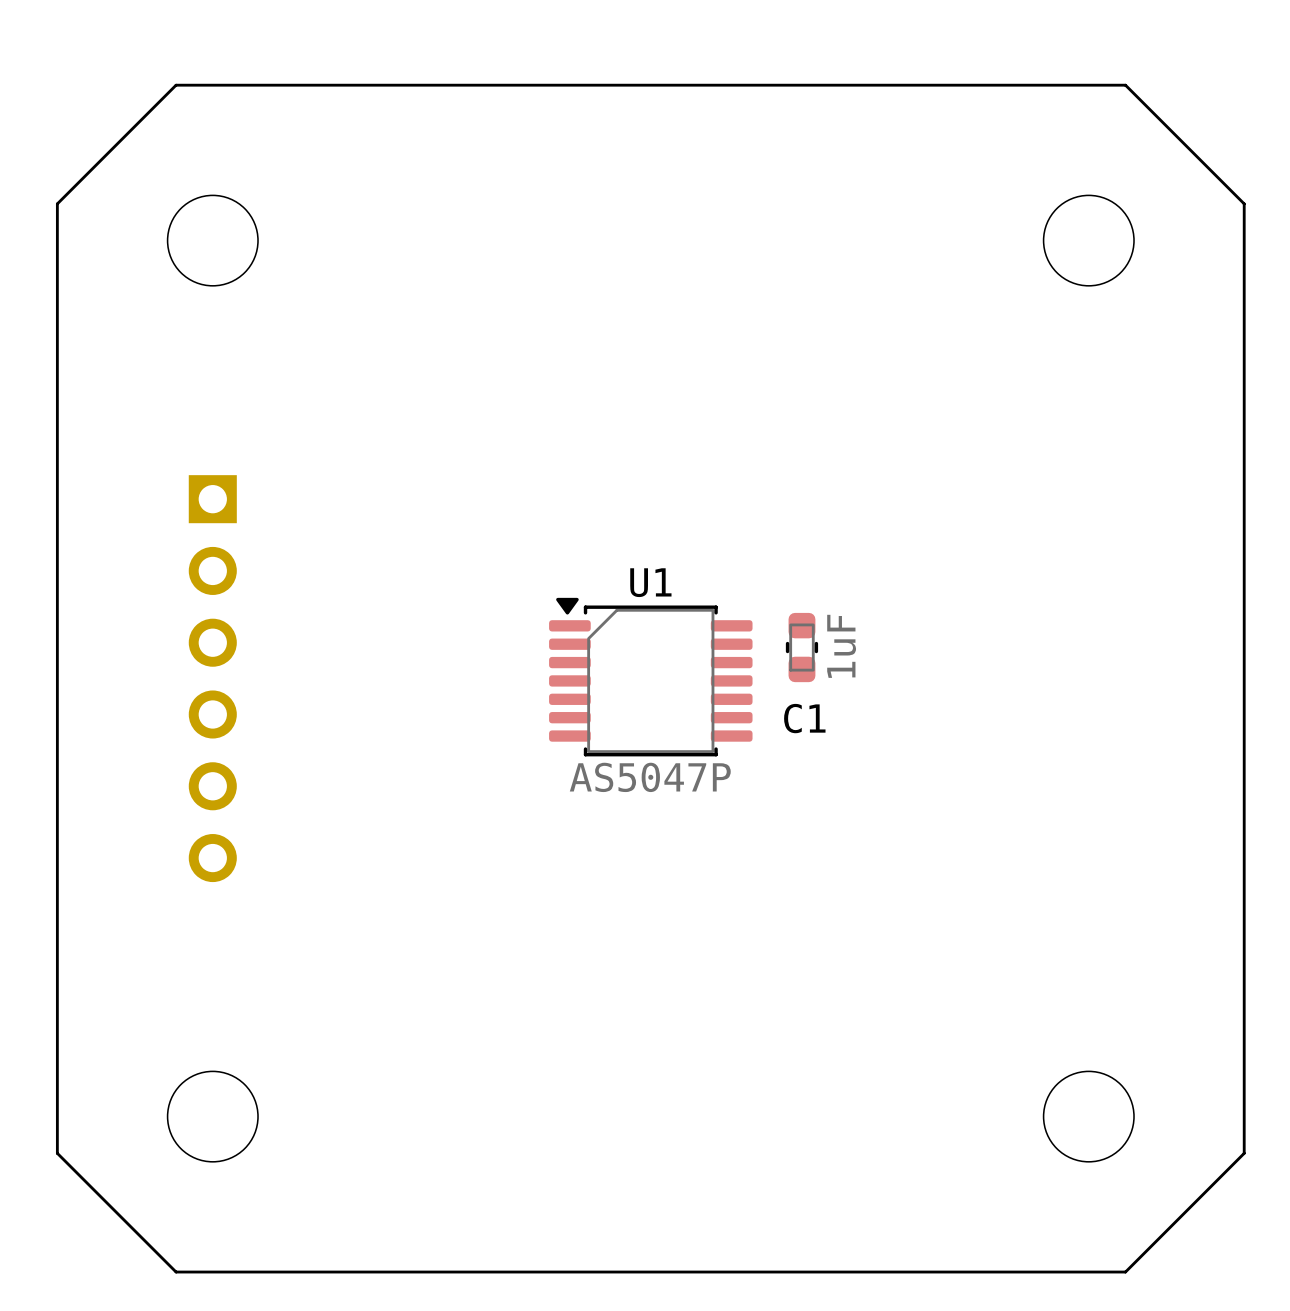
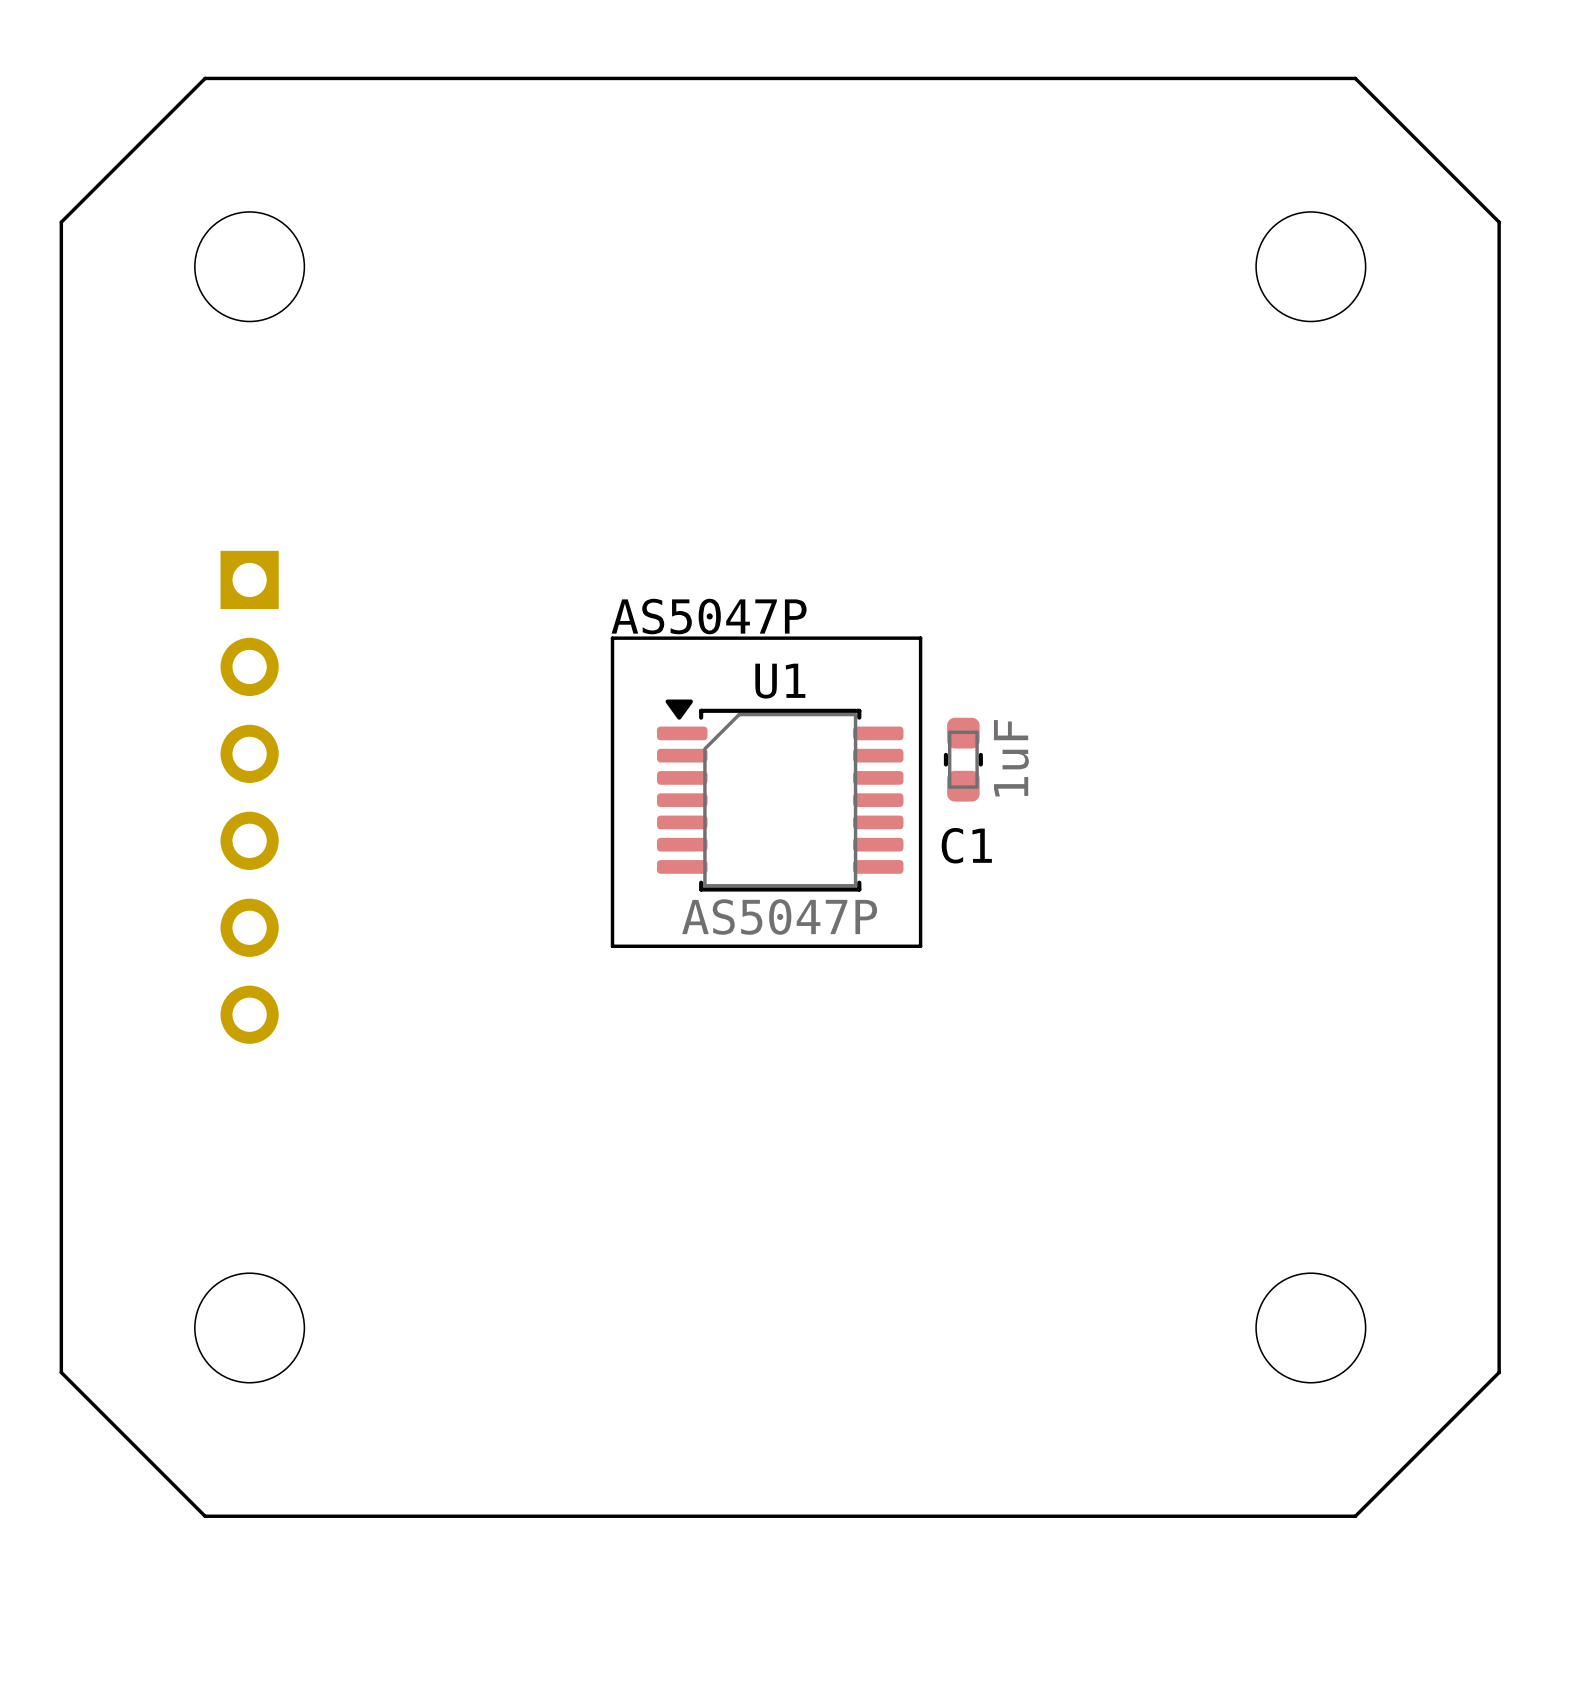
text: none -> AS5047P (709, 616)
line: none -> (612, 638) (920, 638) (920, 946) (612, 946) (612, 638)

